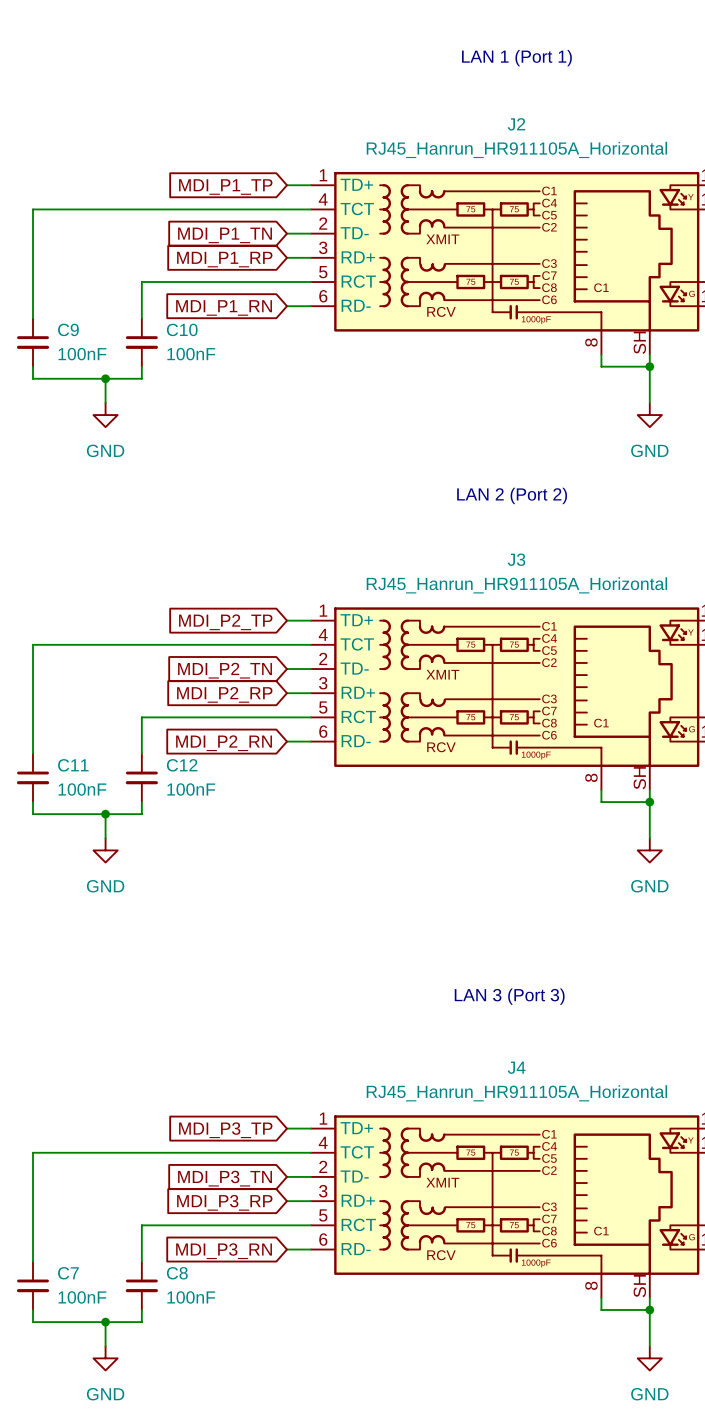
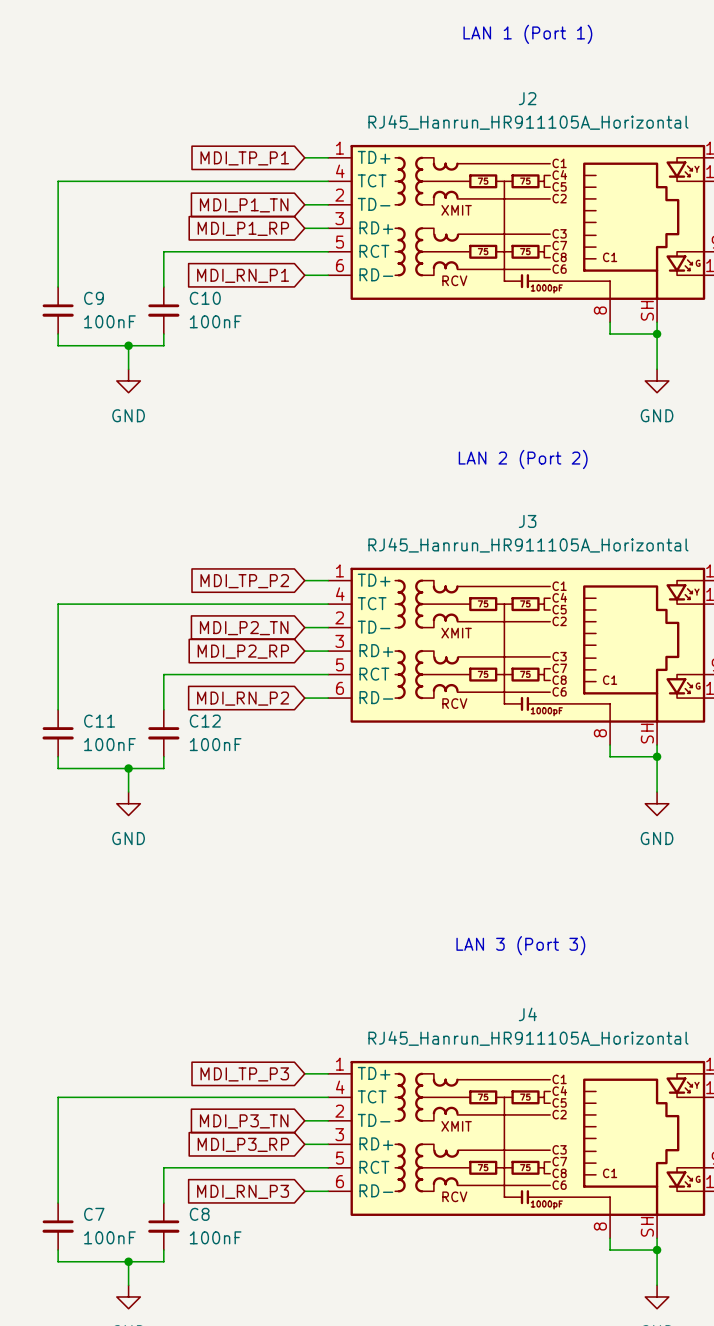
global label: MDI_P1_TP (225, 187) -> MDI_TP_P1 (244, 158)
global label: MDI_P1_RN (224, 307) -> MDI_RN_P1 (243, 275)
global label: MDI_P2_TP (225, 622) -> MDI_TP_P2 (244, 581)
global label: MDI_P2_RN (224, 743) -> MDI_RN_P2 (243, 698)
global label: MDI_P3_TP (225, 1130) -> MDI_TP_P3 (244, 1074)
global label: MDI_P3_RN (224, 1251) -> MDI_RN_P3 (243, 1191)

